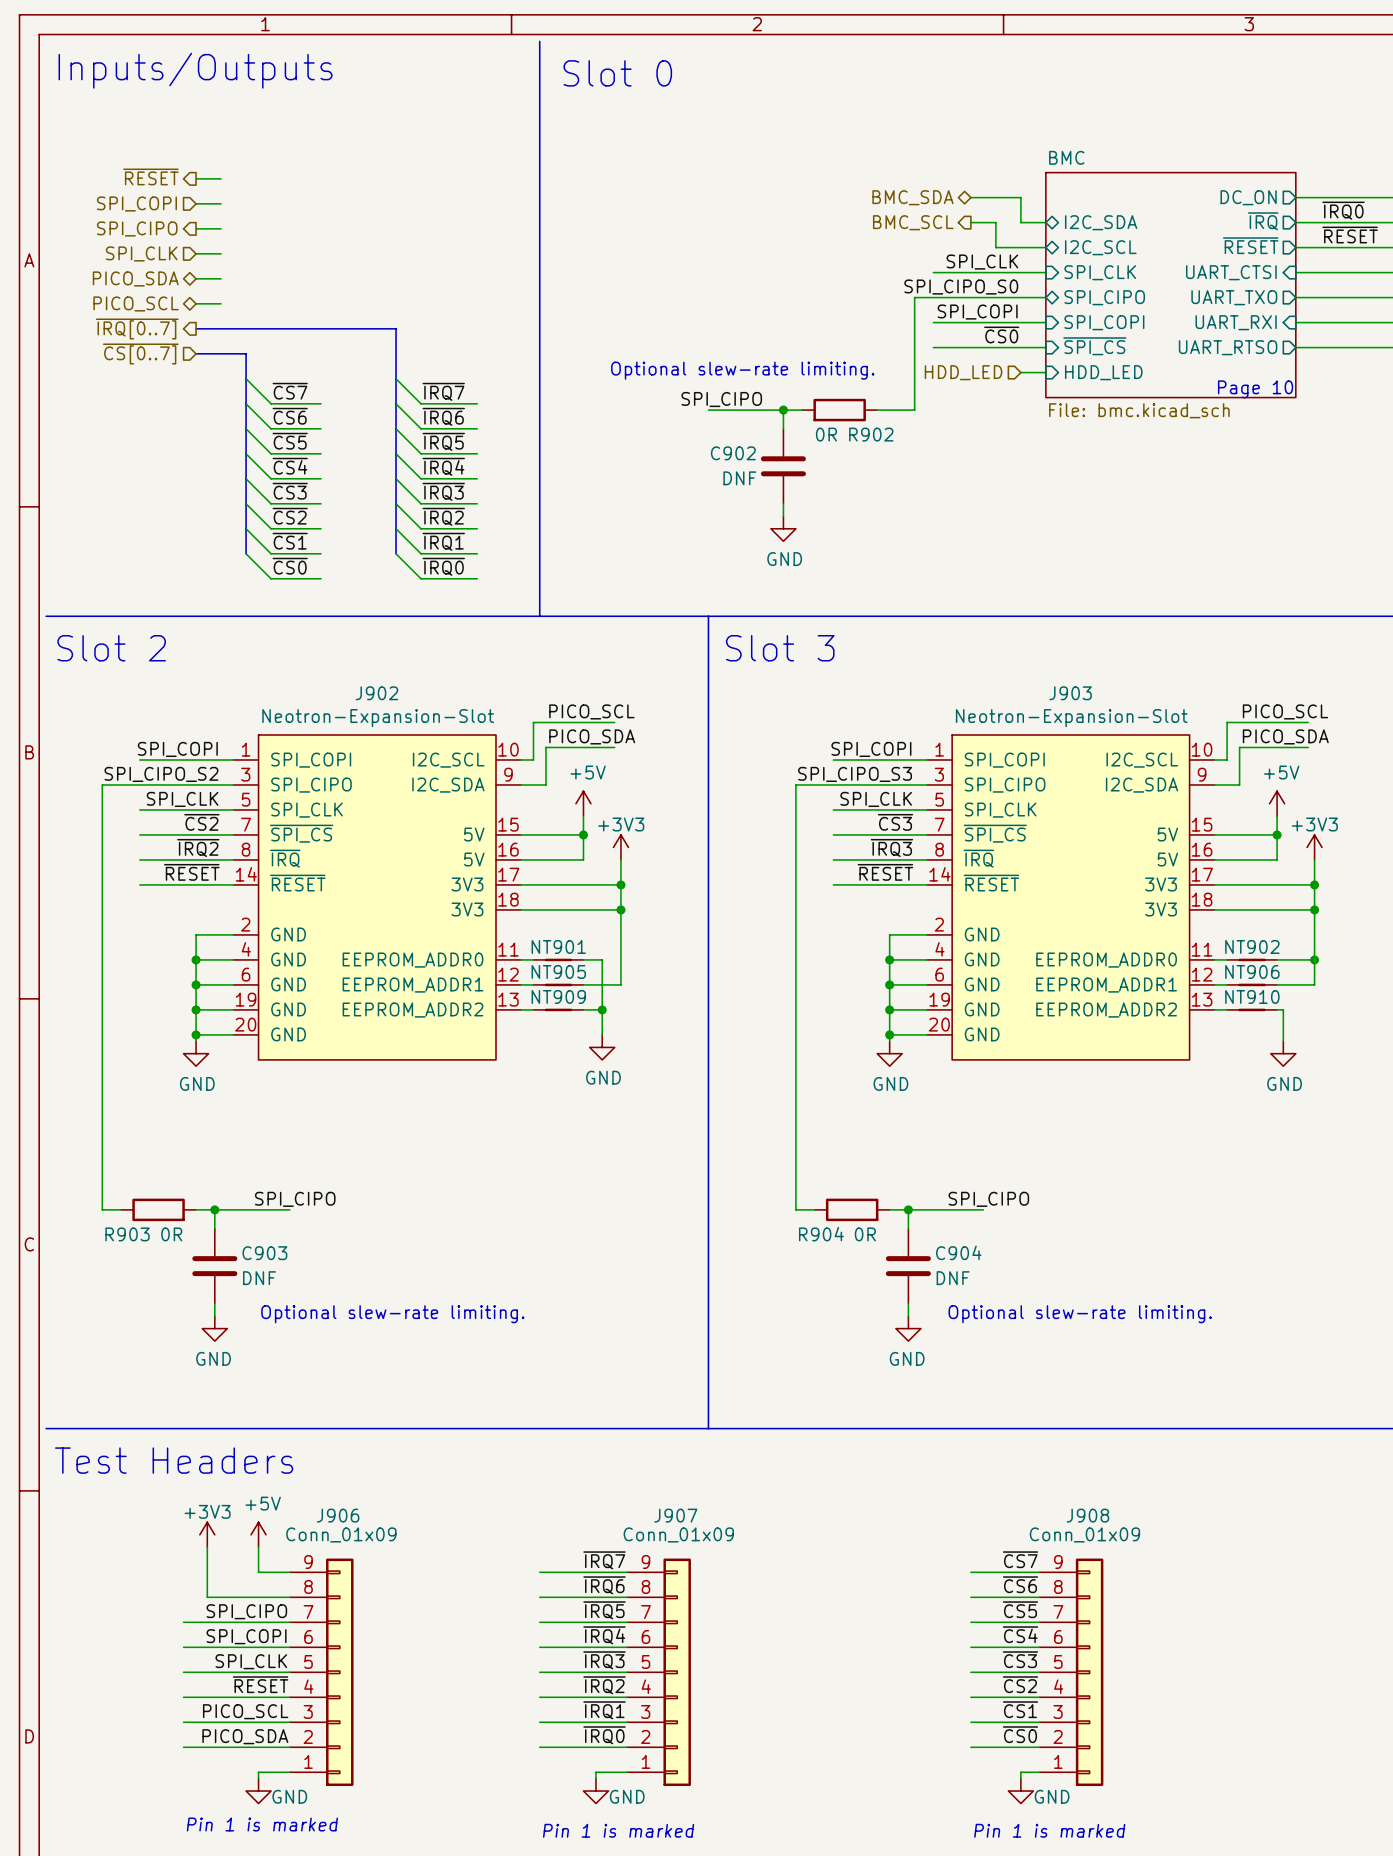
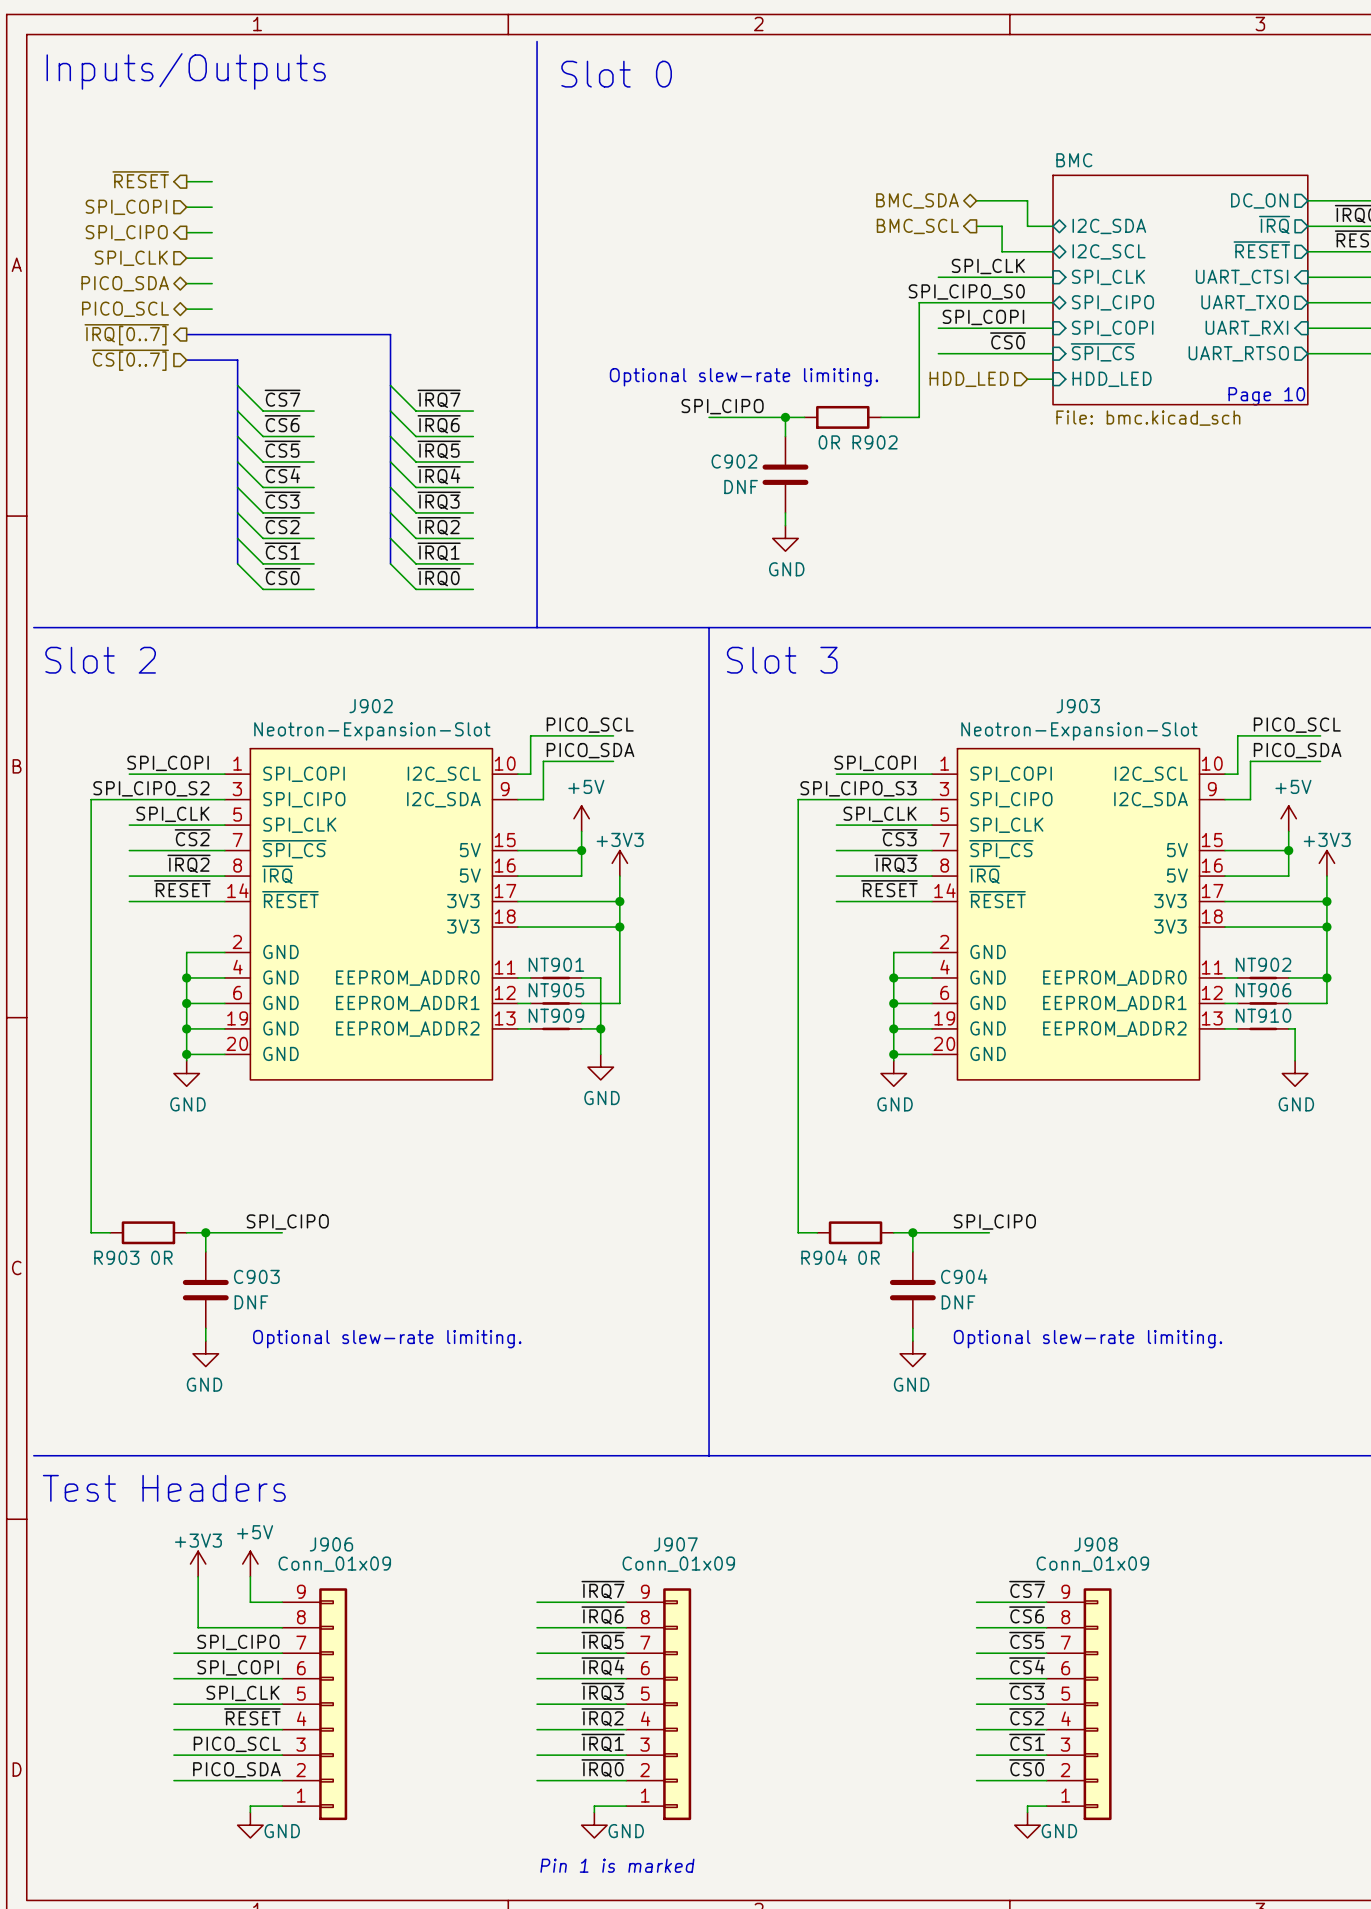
text: Pin 1 is marked (262, 1824) -> none
text: Pin 1 is marked (1049, 1830) -> none

